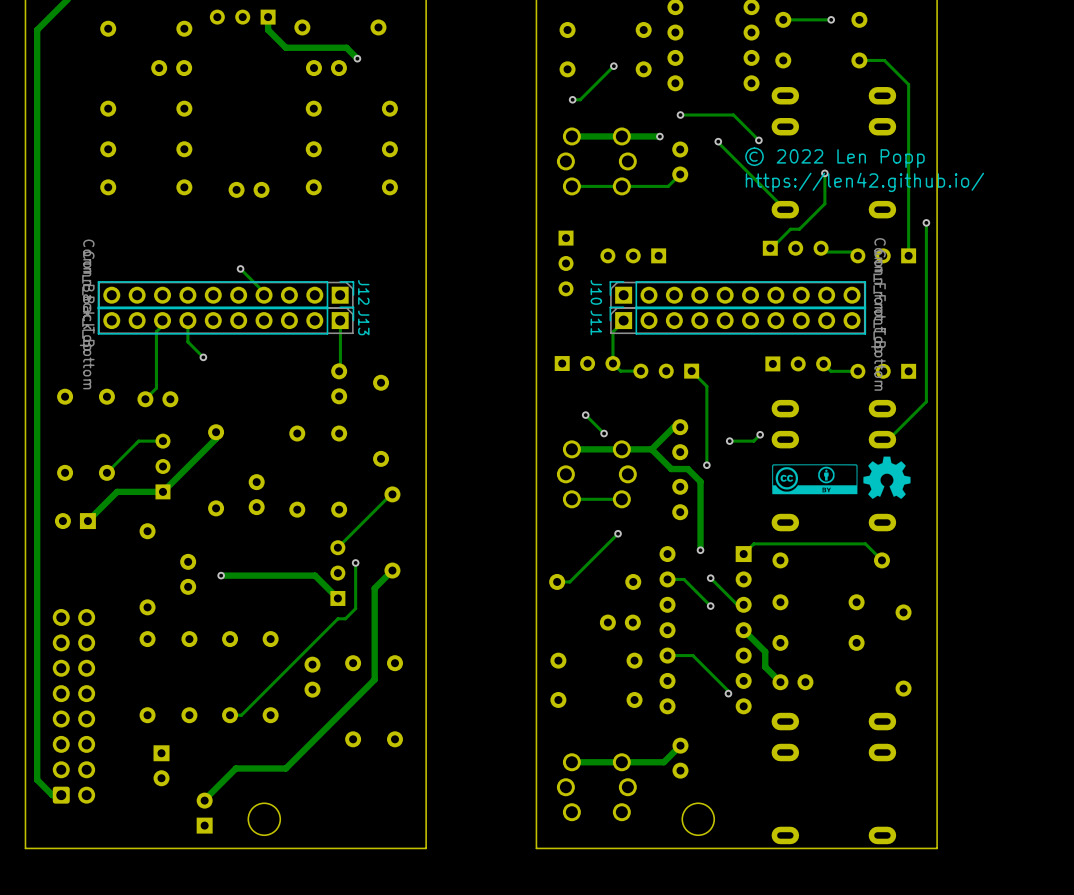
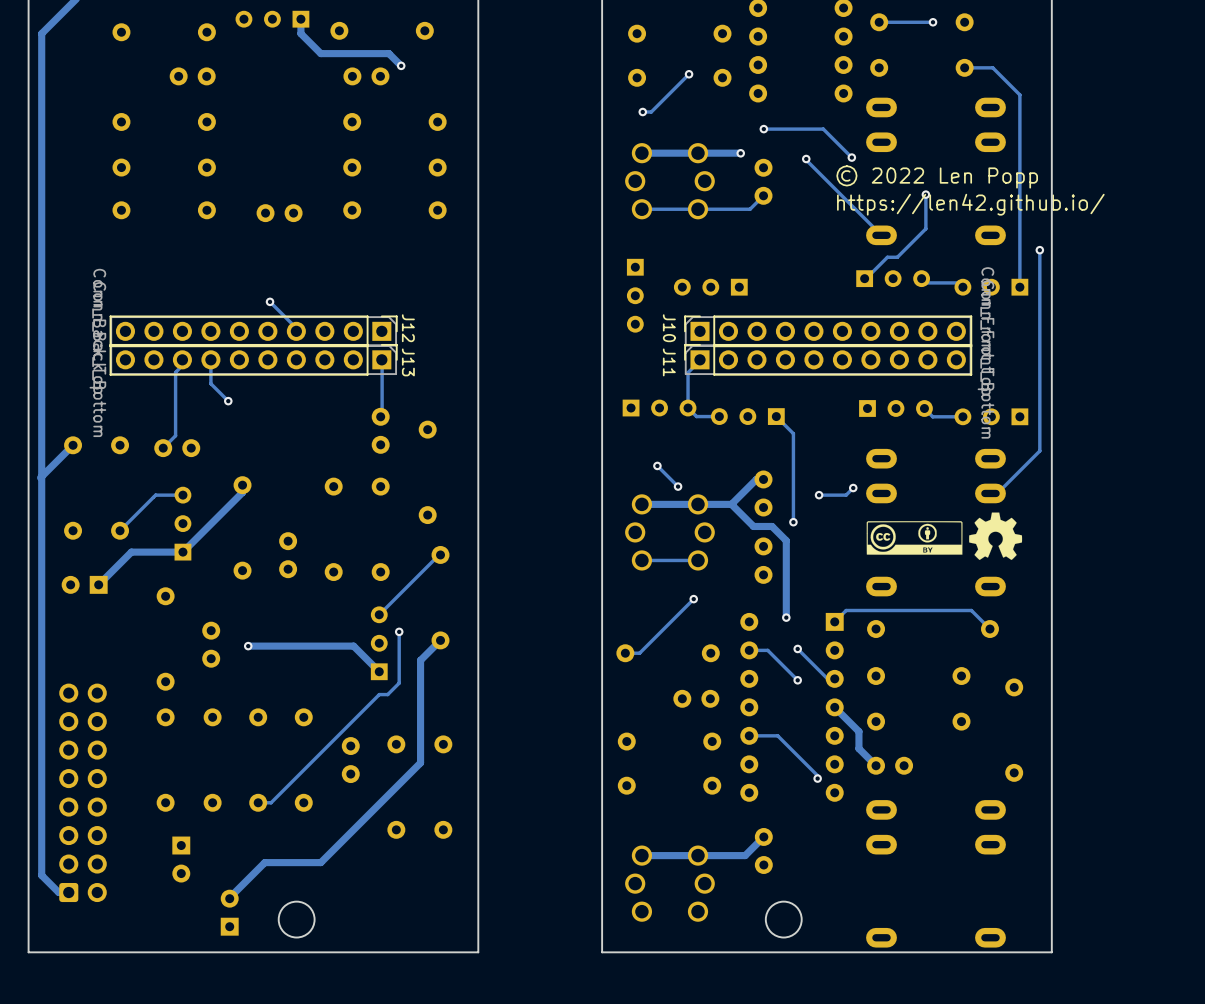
track: none -> (73, 445) (40, 477)

